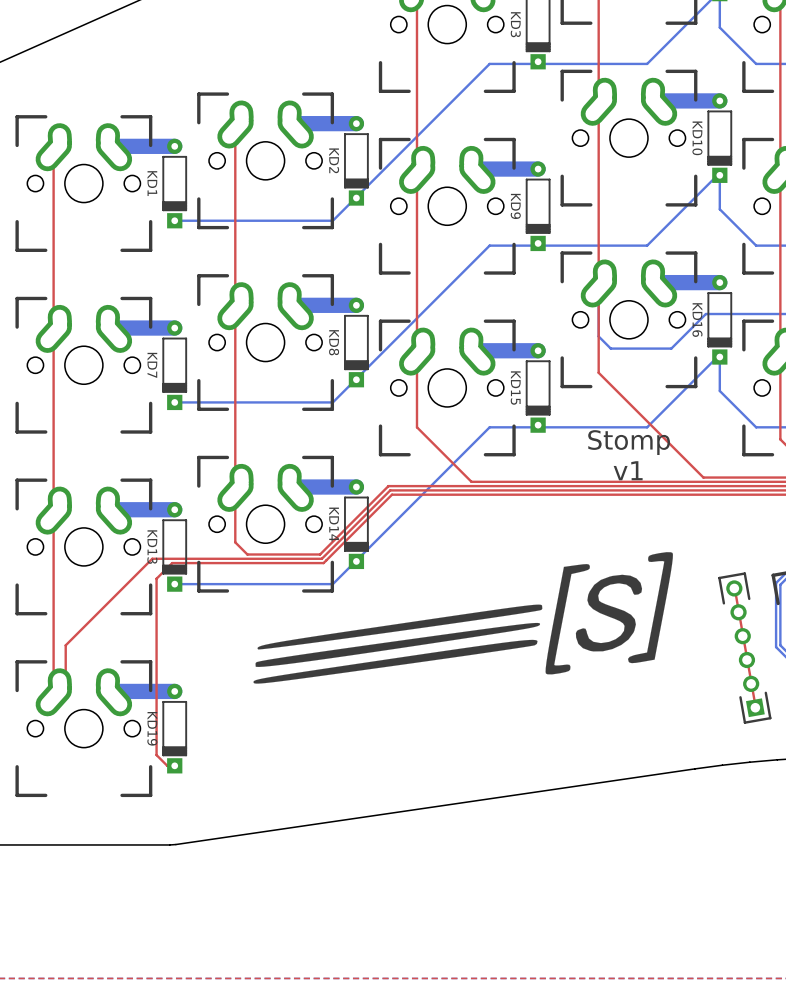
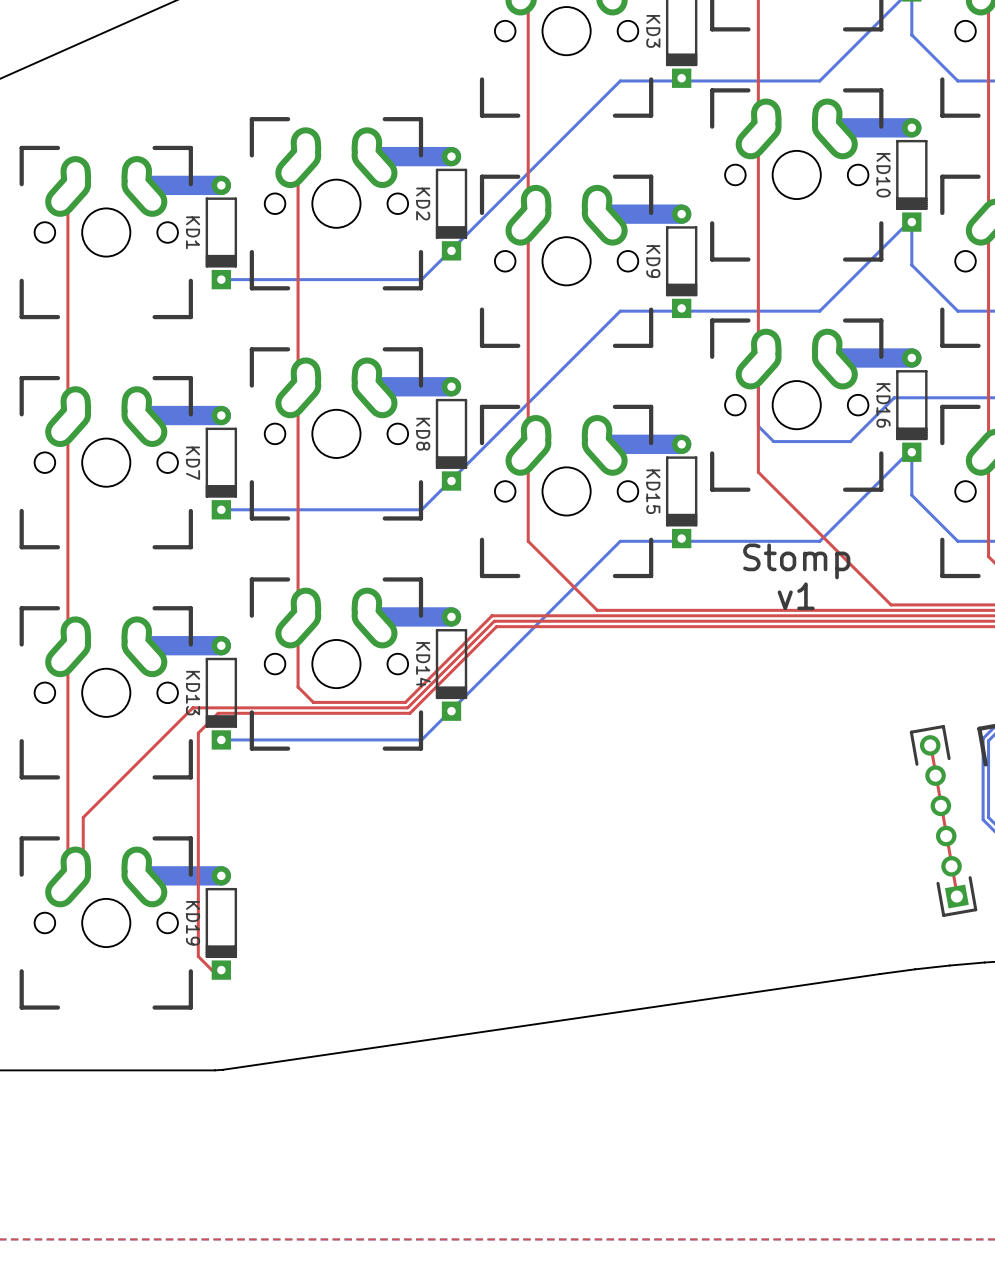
drawing: [253, 552, 673, 684] -> none

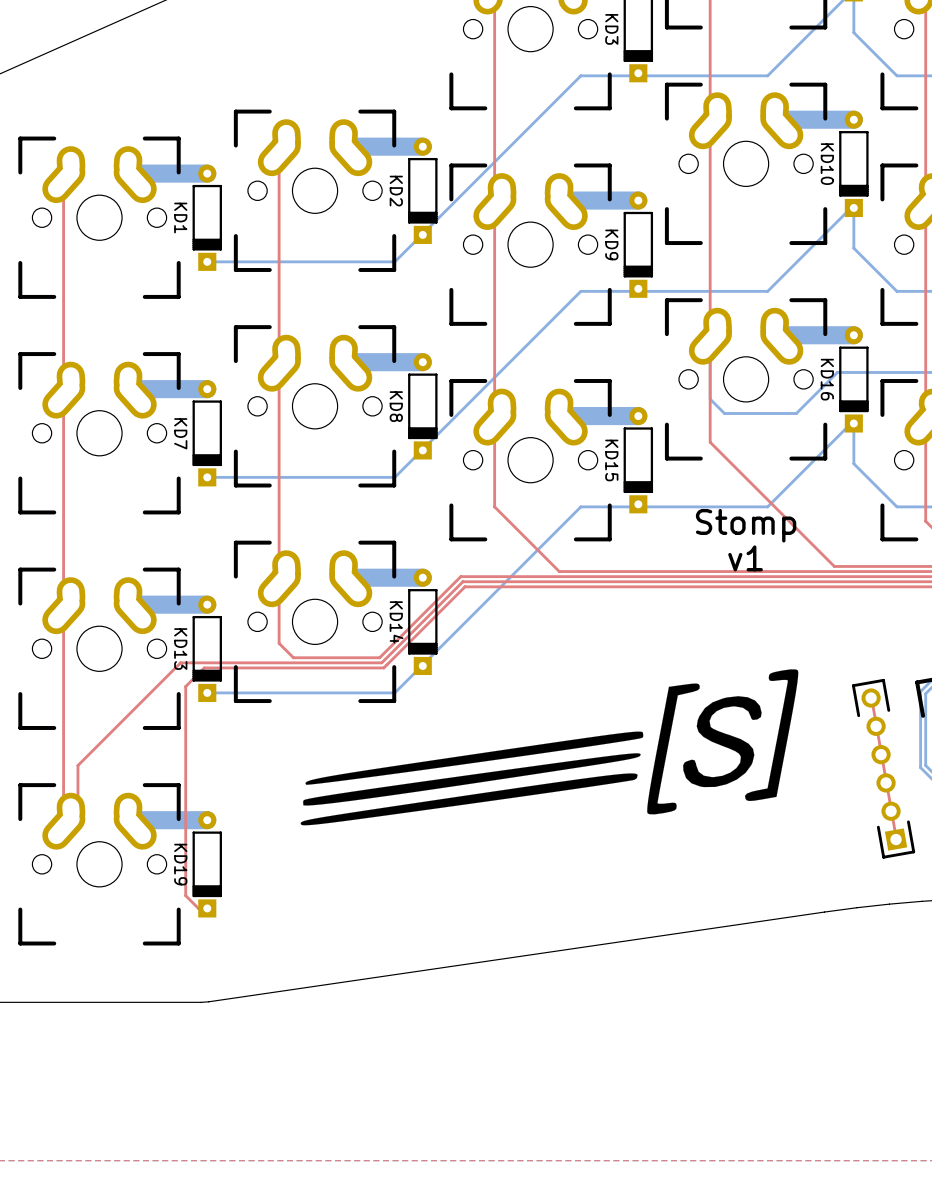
drawing: none -> [300, 669, 799, 826]

